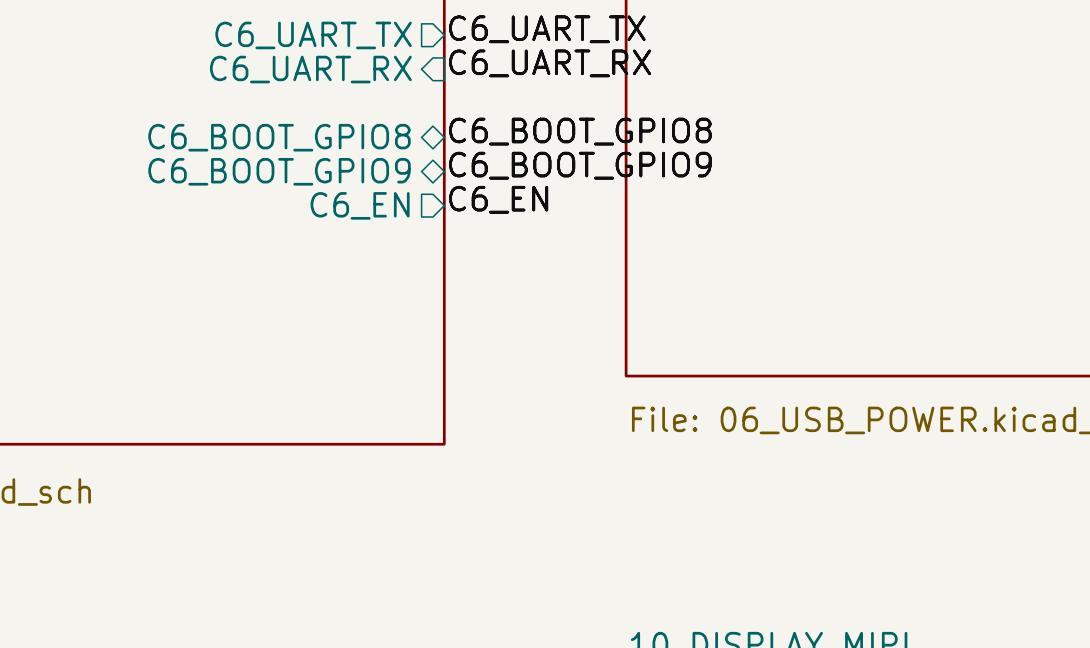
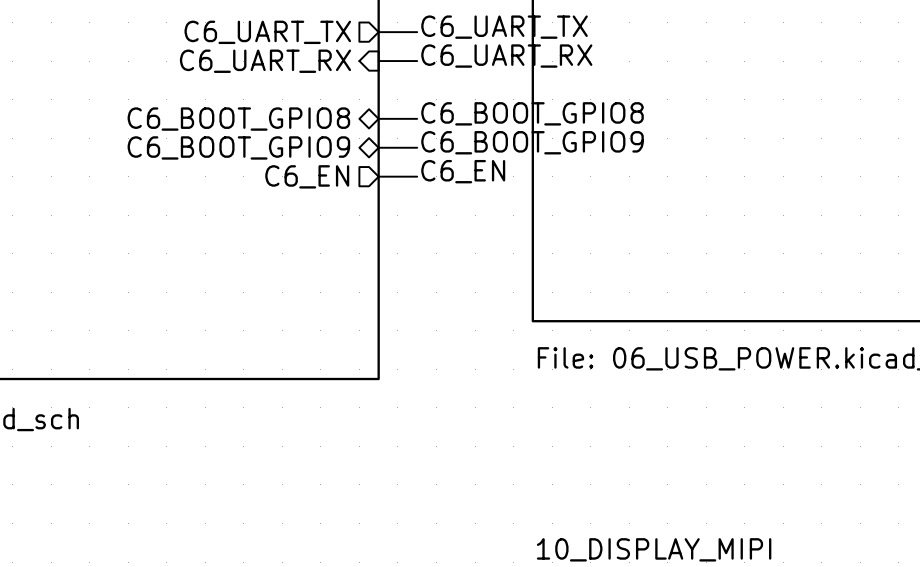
label position: C6_UART_TX (547, 29) -> C6_UART_TX (504, 27)
wire: none -> (378, 32) (417, 32)
label position: C6_UART_RX (549, 63) -> C6_UART_RX (506, 56)
wire: none -> (378, 61) (417, 61)
label position: C6_BOOT_GPIO8 (580, 131) -> C6_BOOT_GPIO8 (532, 113)
wire: none -> (378, 118) (417, 118)
label position: C6_BOOT_GPIO9 (580, 165) -> C6_BOOT_GPIO9 (532, 142)
wire: none -> (378, 147) (417, 147)
label position: C6_EN (498, 199) -> C6_EN (463, 171)
wire: none -> (378, 176) (417, 176)

